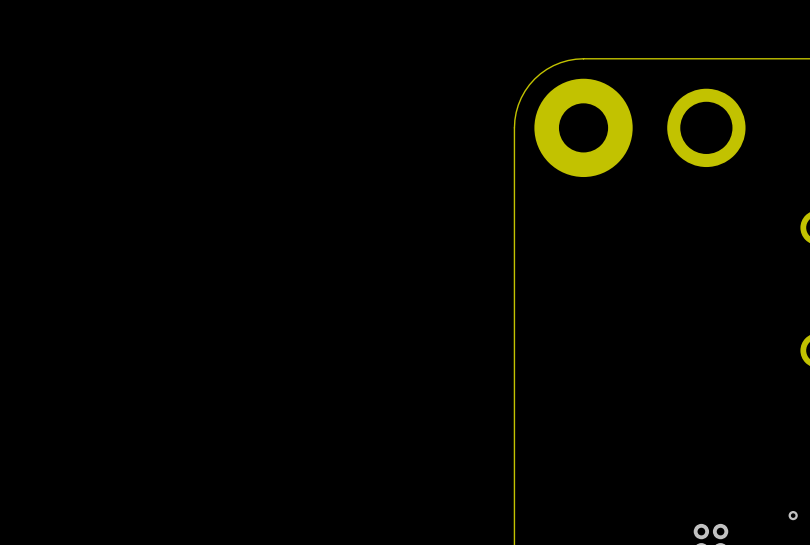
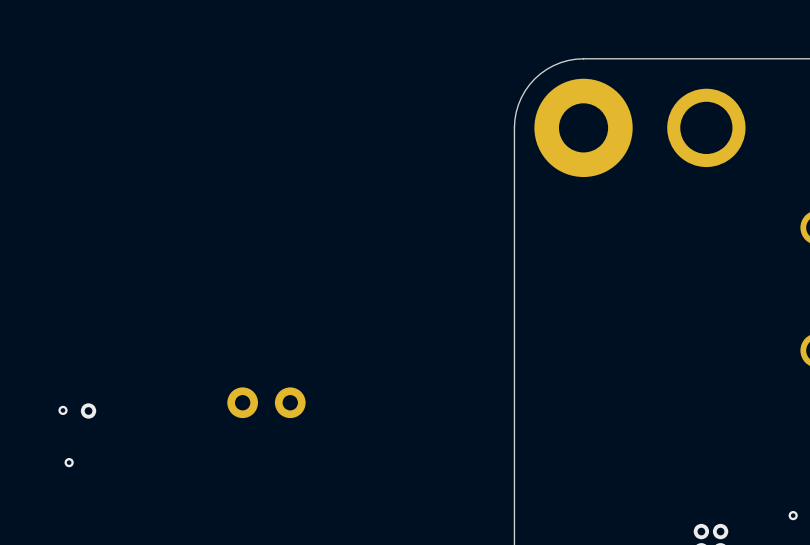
part: none -> (242, 402)
part: none -> (290, 402)
via: none -> (63, 410)
via: none -> (88, 410)
via: none -> (69, 462)

